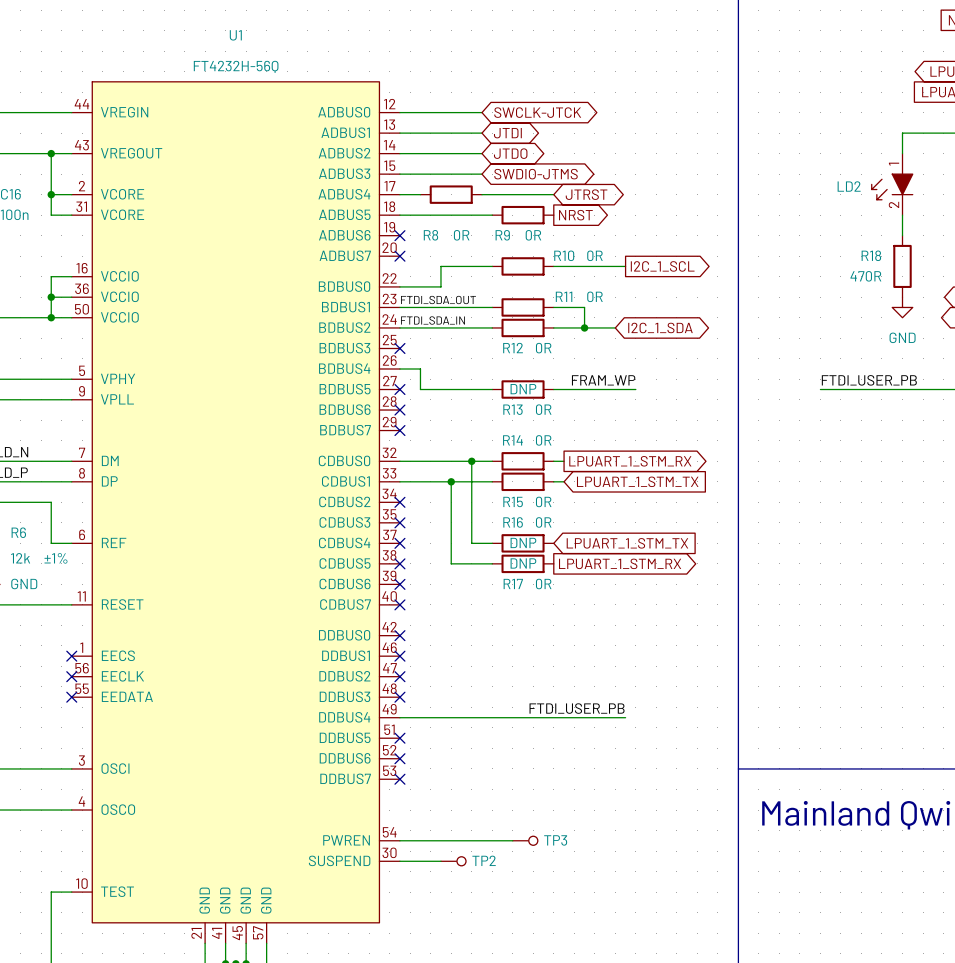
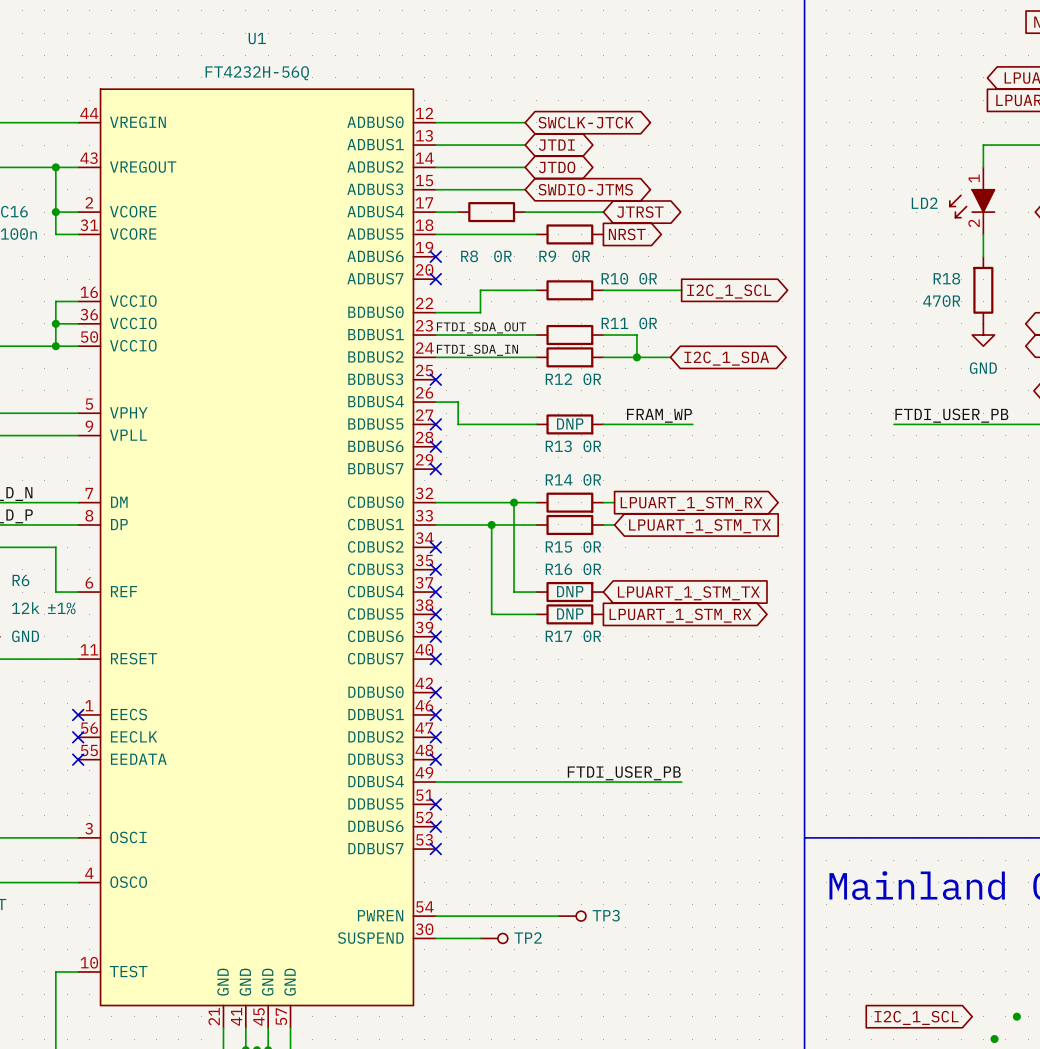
global label: none -> I2C_1_SCL (916, 1017)
junction: none -> (1016, 1016)
junction: none -> (994, 1039)

